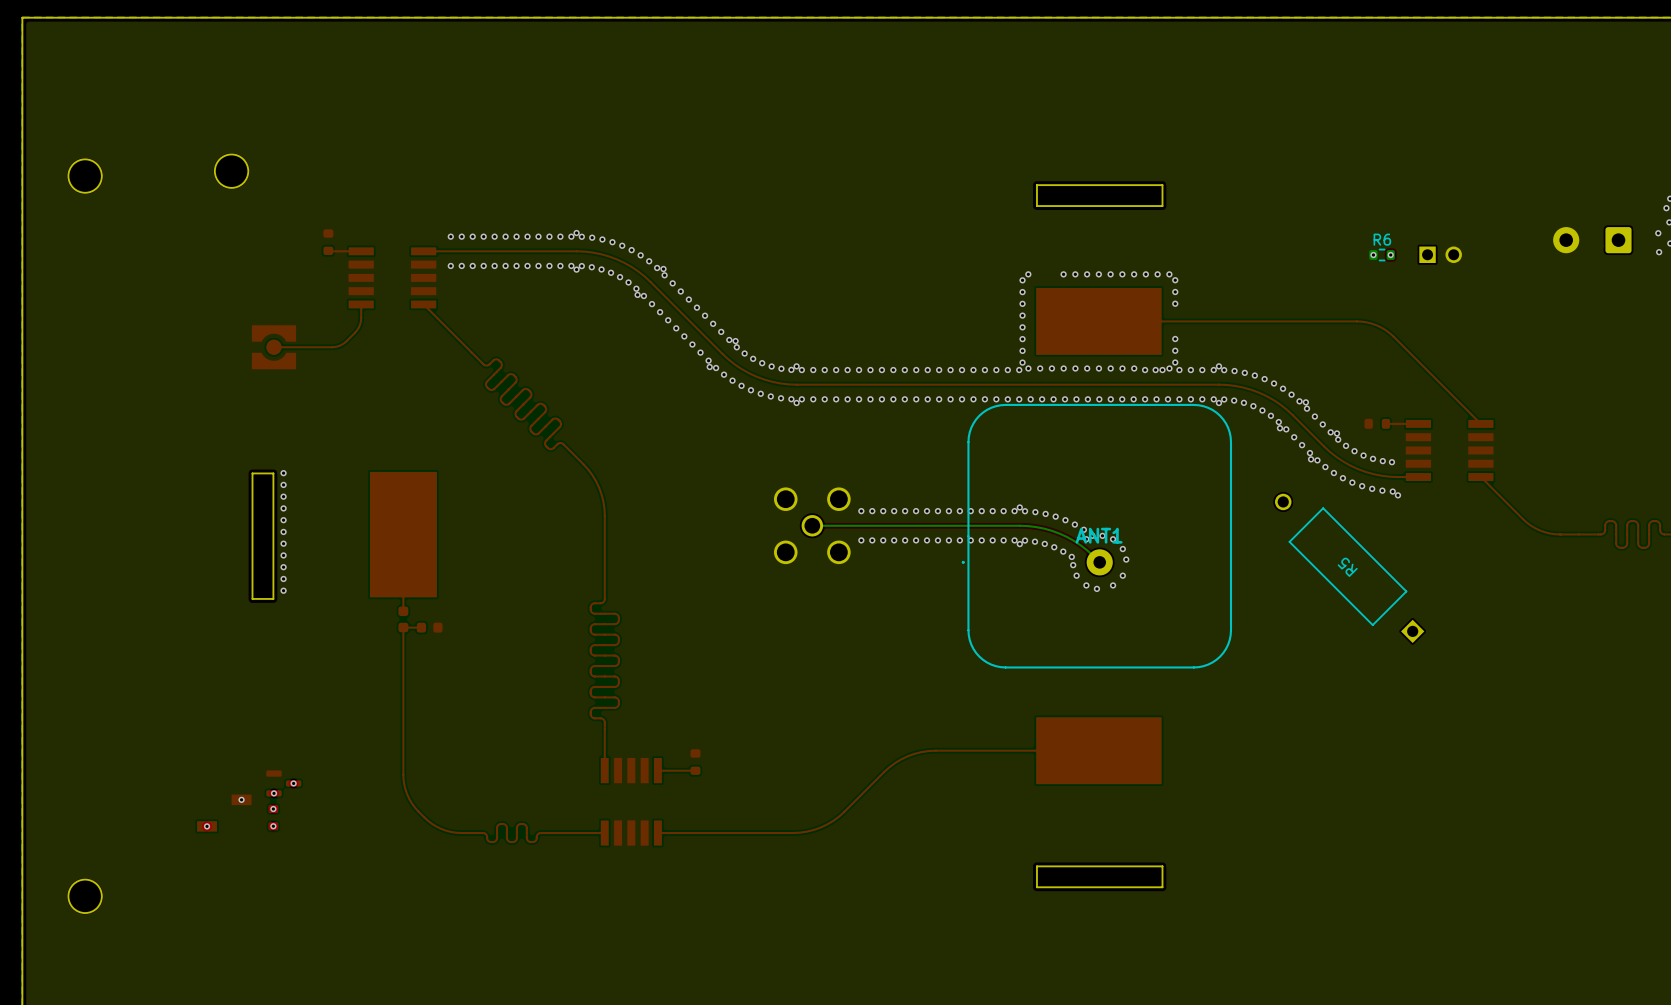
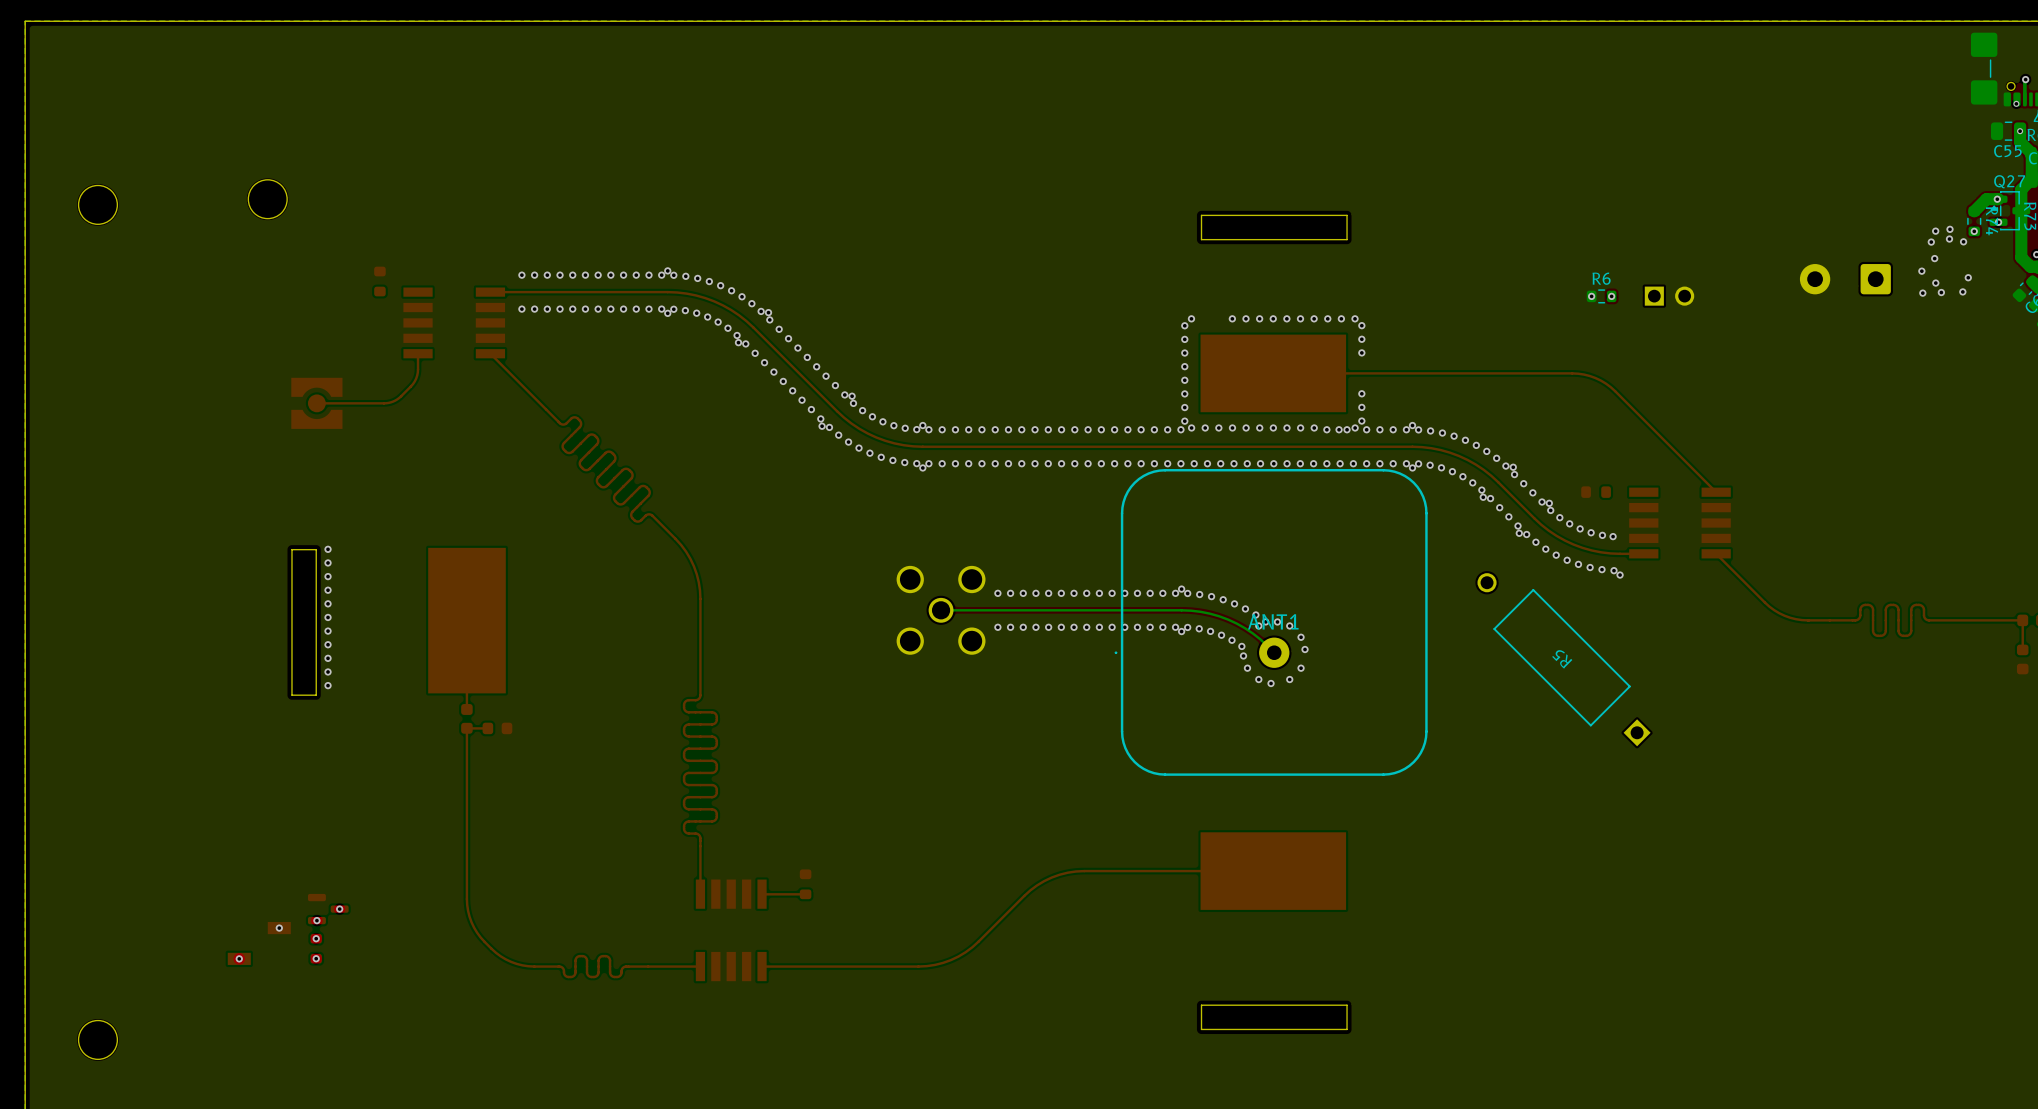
top track: (328, 250) (361, 251) -> none
top track: (1418, 423) (1386, 423) -> none

